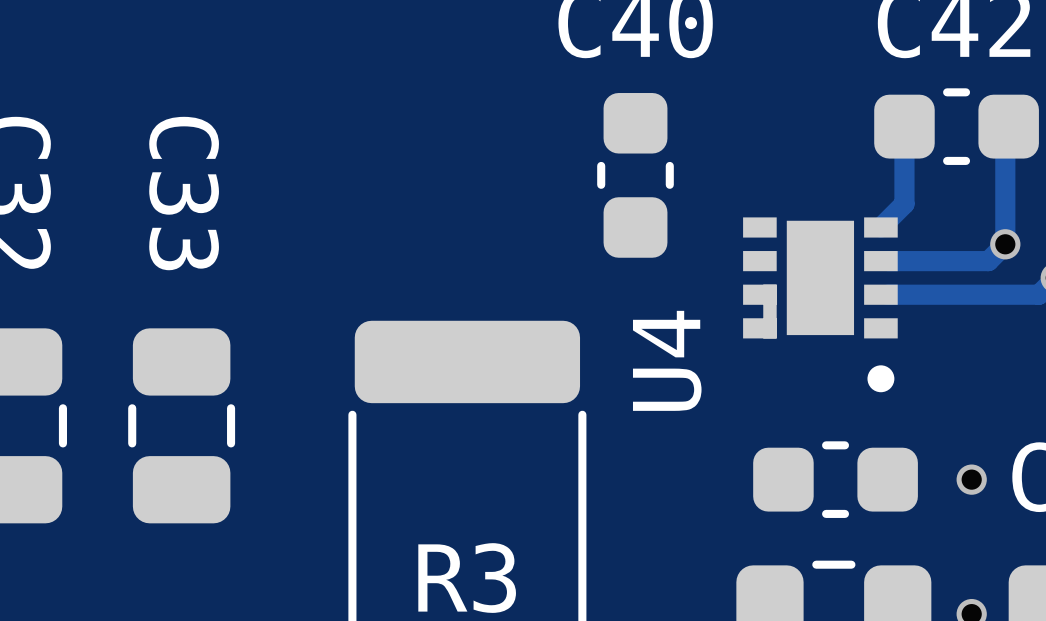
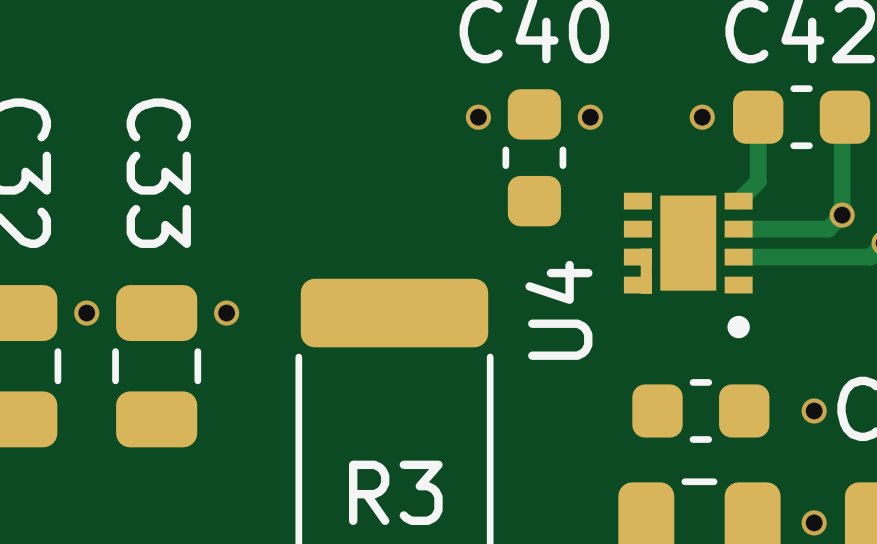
via: none -> (478, 117)
via: none -> (590, 117)
via: none -> (702, 117)
via: none -> (86, 313)
via: none -> (226, 313)

